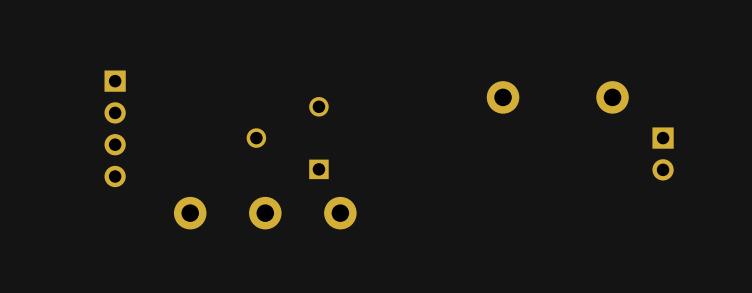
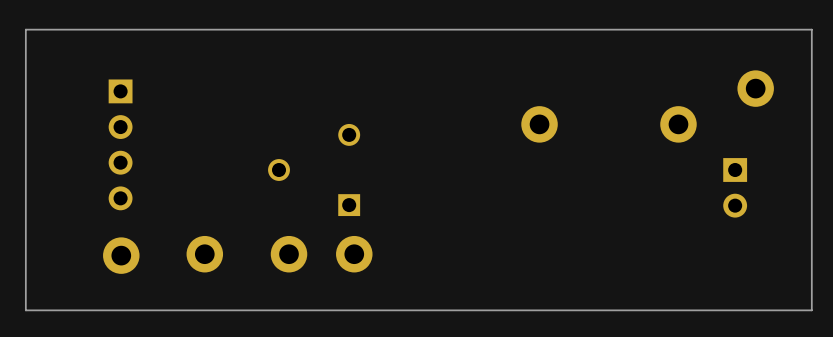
board edge: none -> (811, 29) (25, 29) (25, 310) (811, 310) (811, 29)
part: none -> (755, 88)
part position: (503, 97) -> (539, 124)
part position: (115, 128) -> (120, 144)
part position: (340, 213) -> (354, 254)
part: none -> (121, 255)

